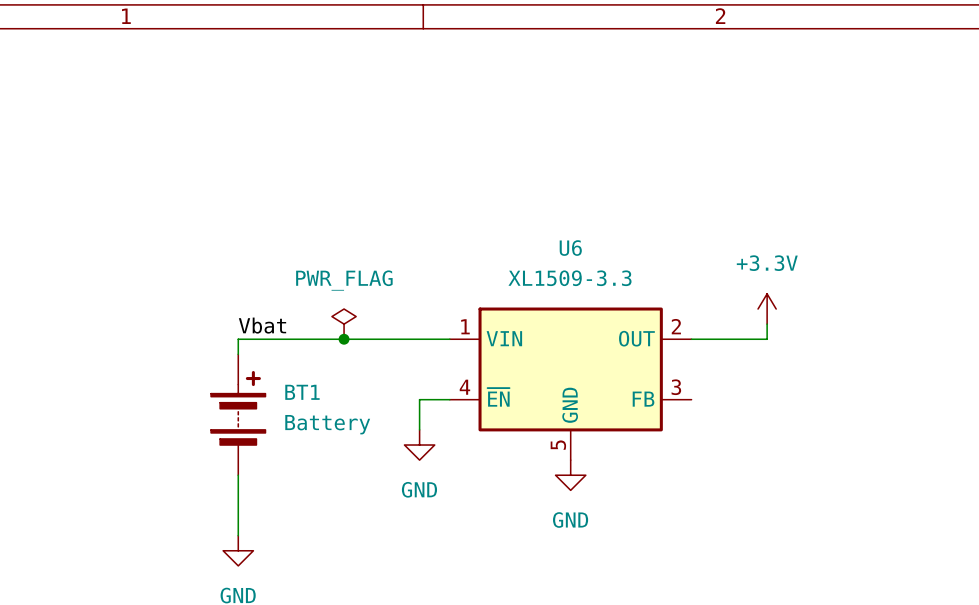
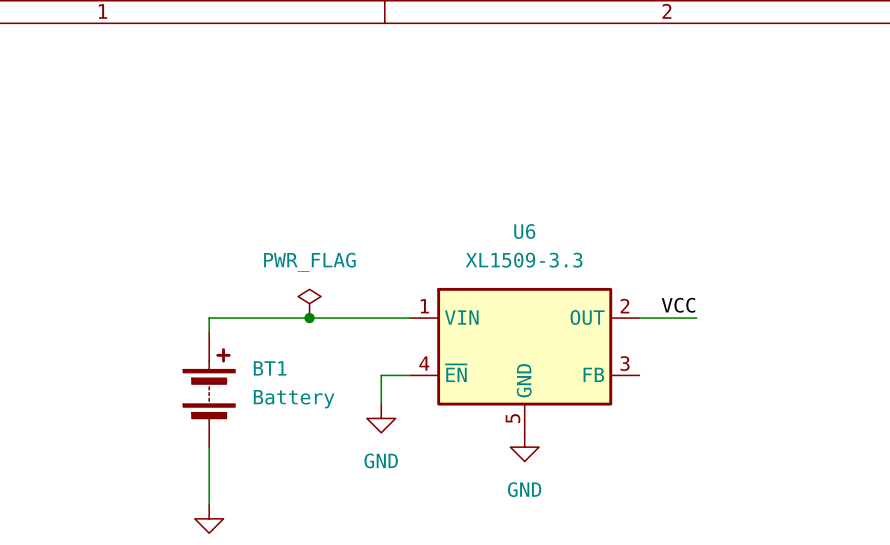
power symbol: +3.3V (767, 309) -> none
wire: (767, 324) (767, 339) (752, 339) -> none
label: Vbat (262, 325) -> none
label: none -> VCC (678, 305)

